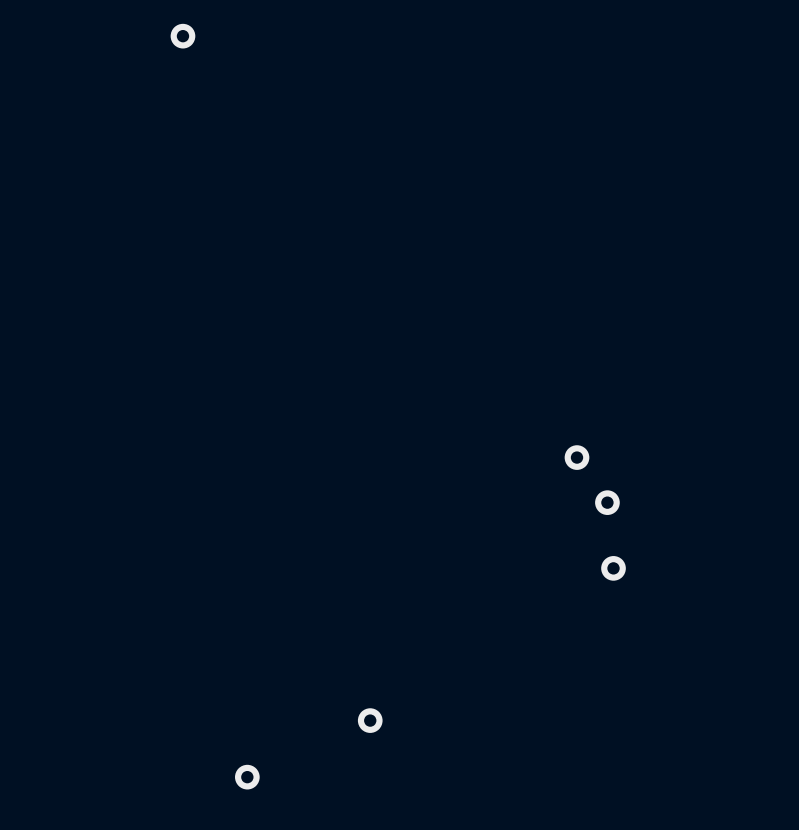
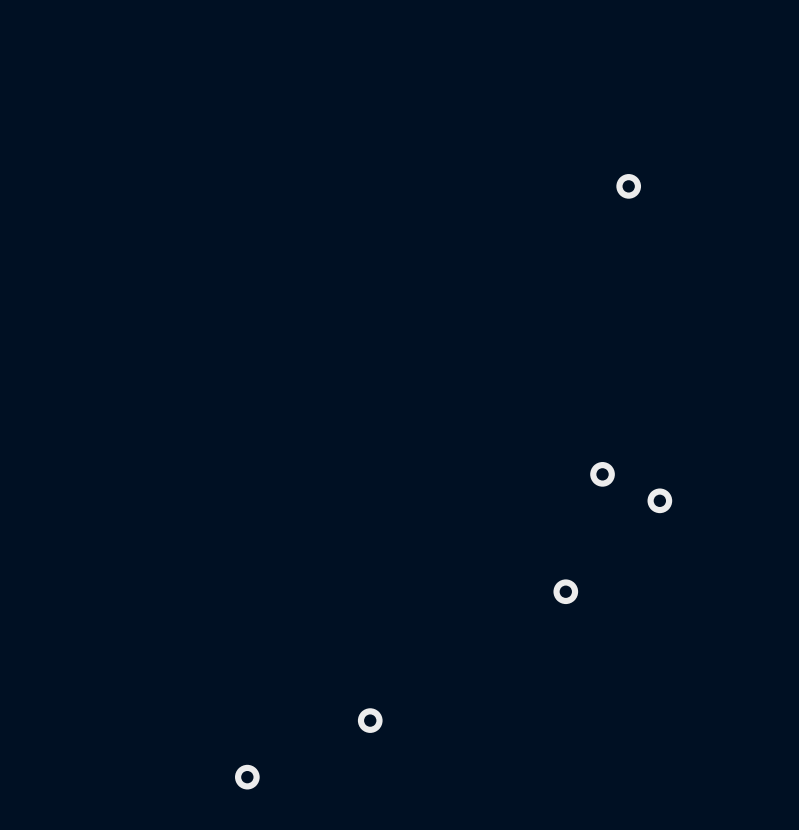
via: (182, 36) -> none
via: none -> (628, 186)
via: (576, 457) -> none
via: none -> (602, 474)
via: none -> (659, 500)
via: (607, 502) -> none
via: (613, 568) -> none
via: none -> (565, 591)

